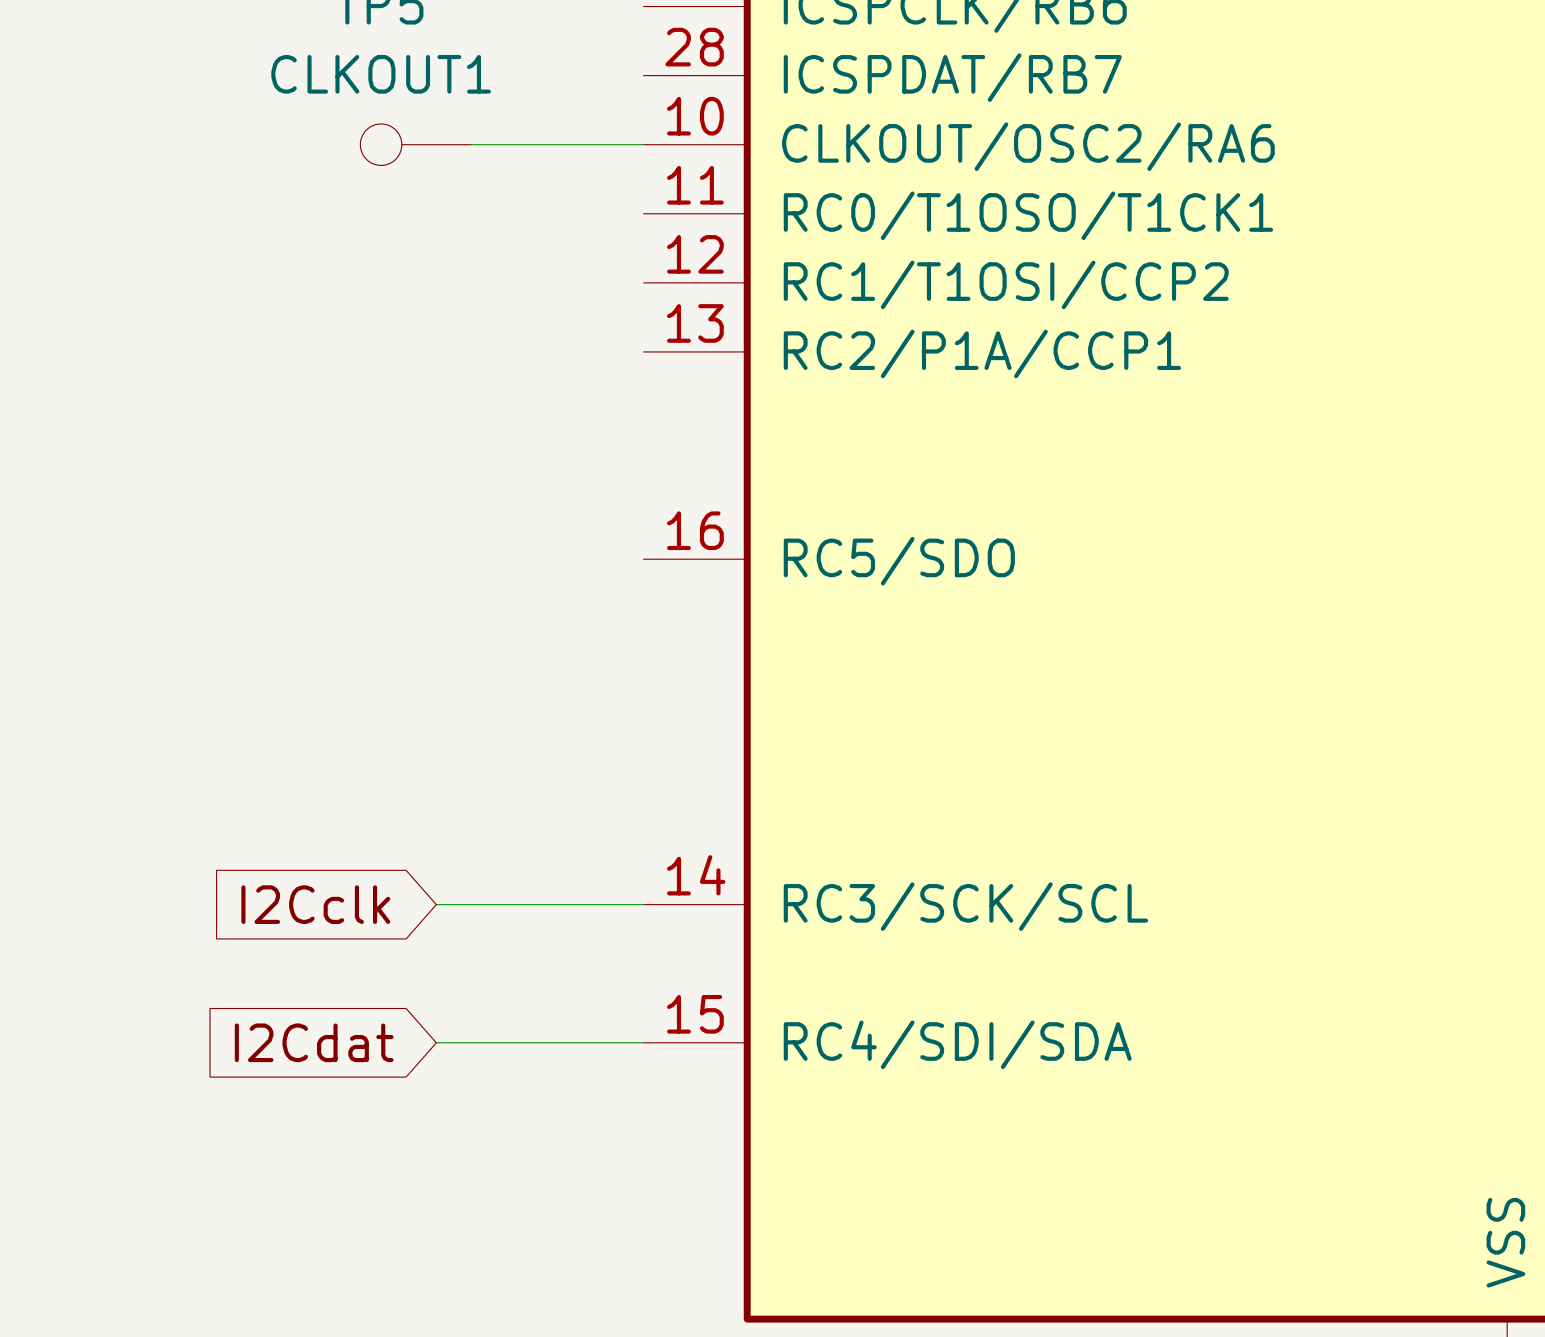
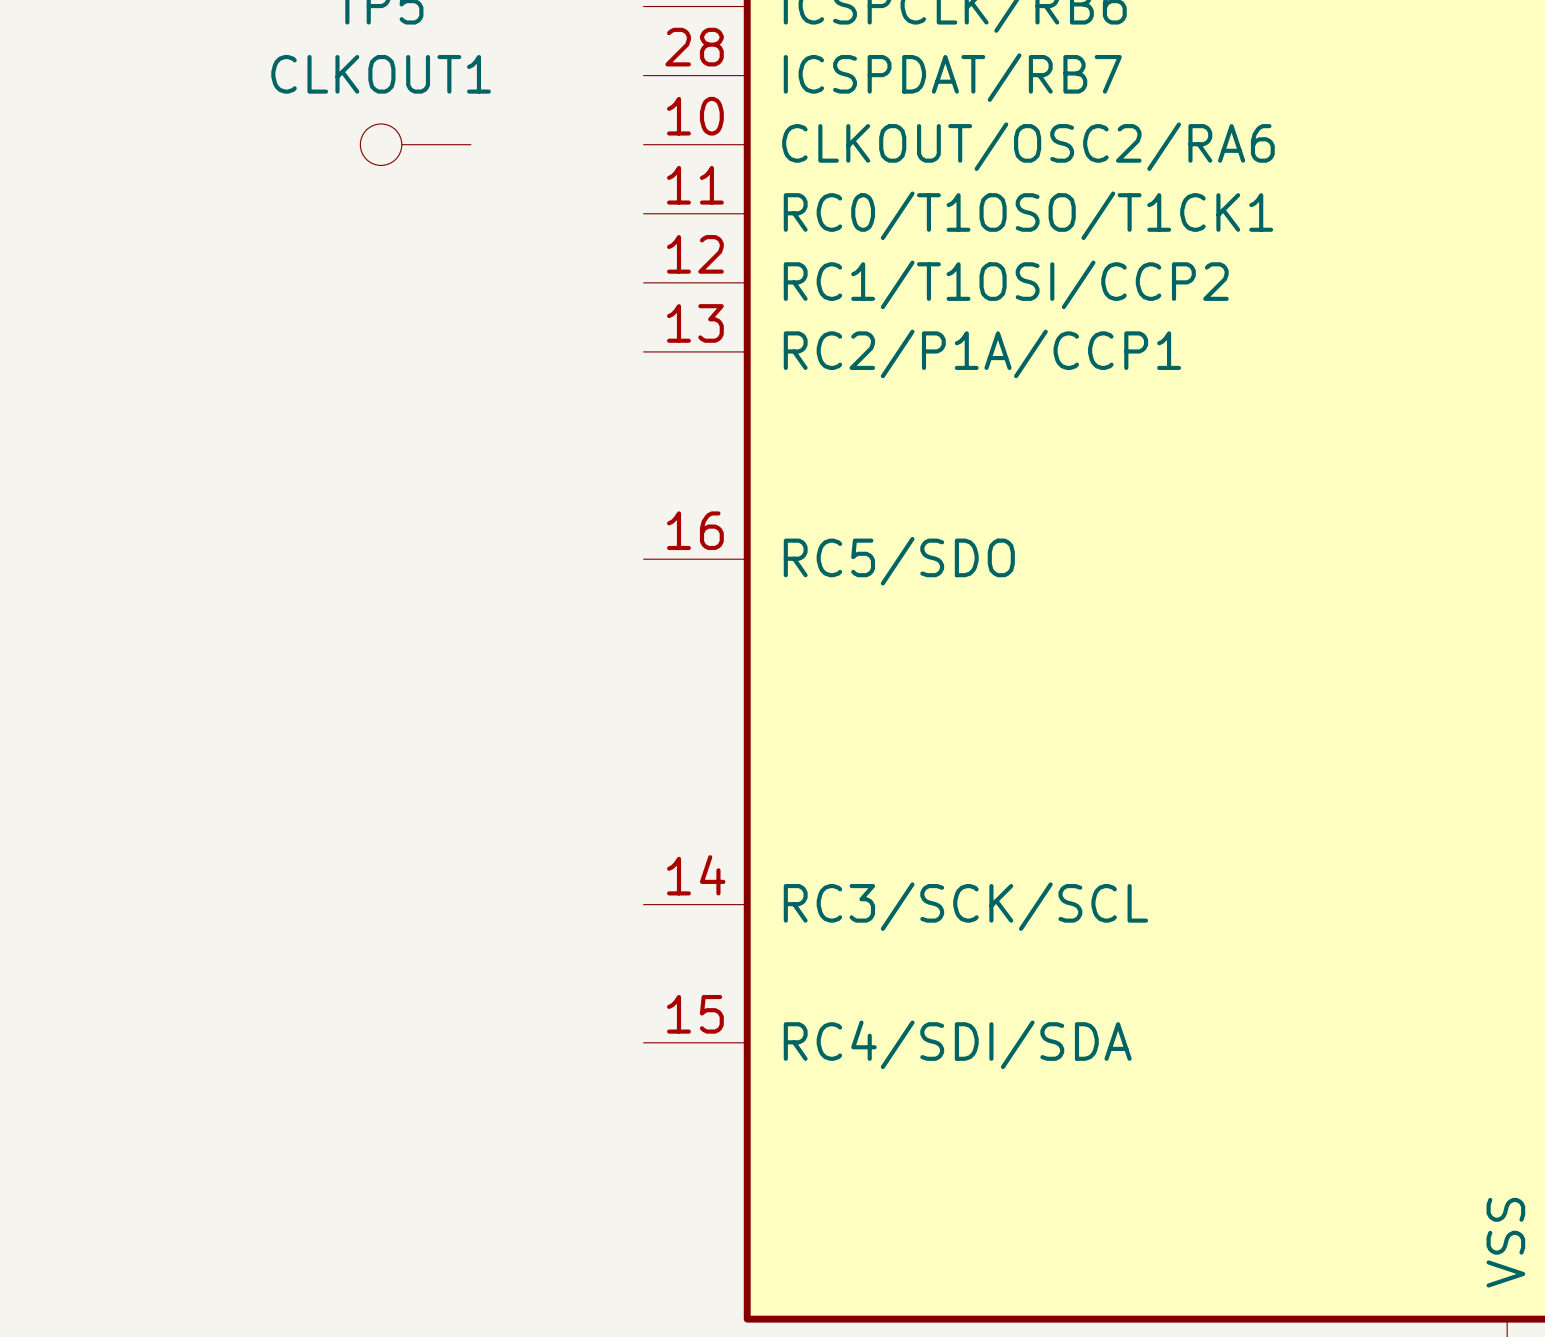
wire: (470, 144) (643, 144) -> none
global label: I2Cclk (315, 904) -> none
wire: (436, 904) (643, 904) -> none
global label: I2Cdat (314, 1042) -> none
wire: (436, 1042) (643, 1042) -> none

